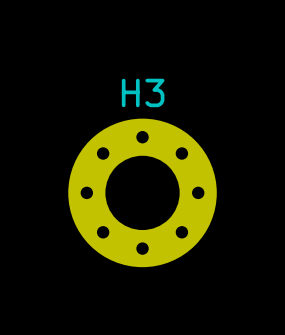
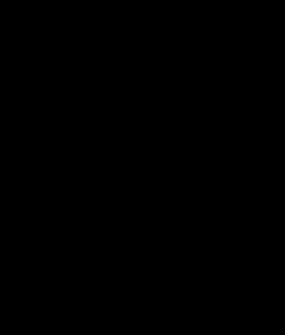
H3: (142, 192) -> none

